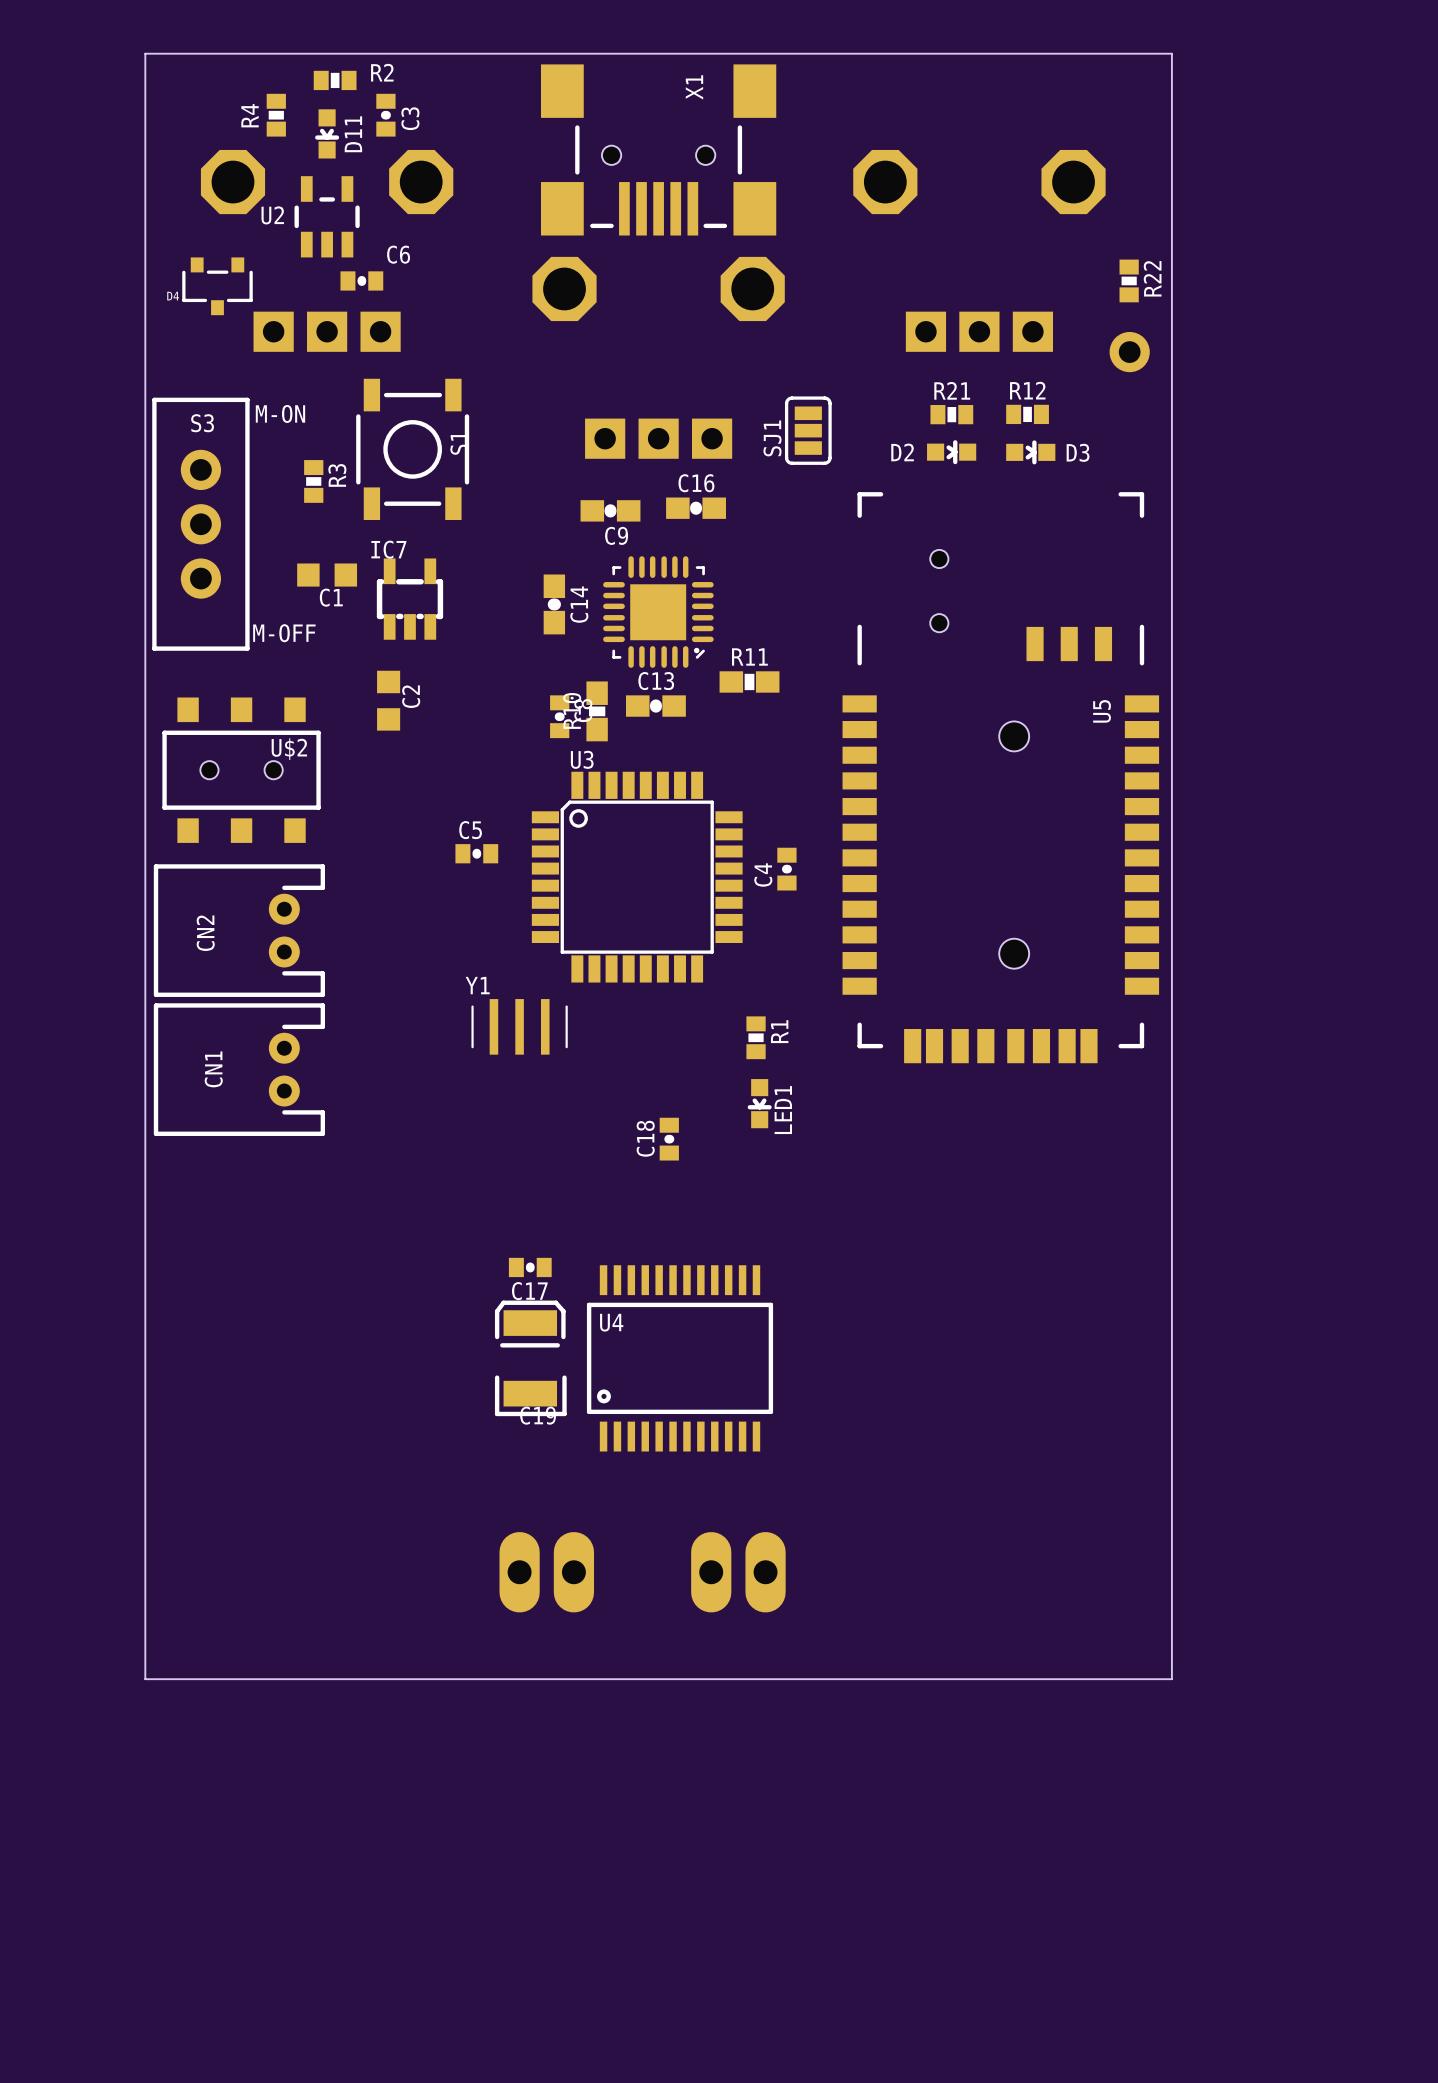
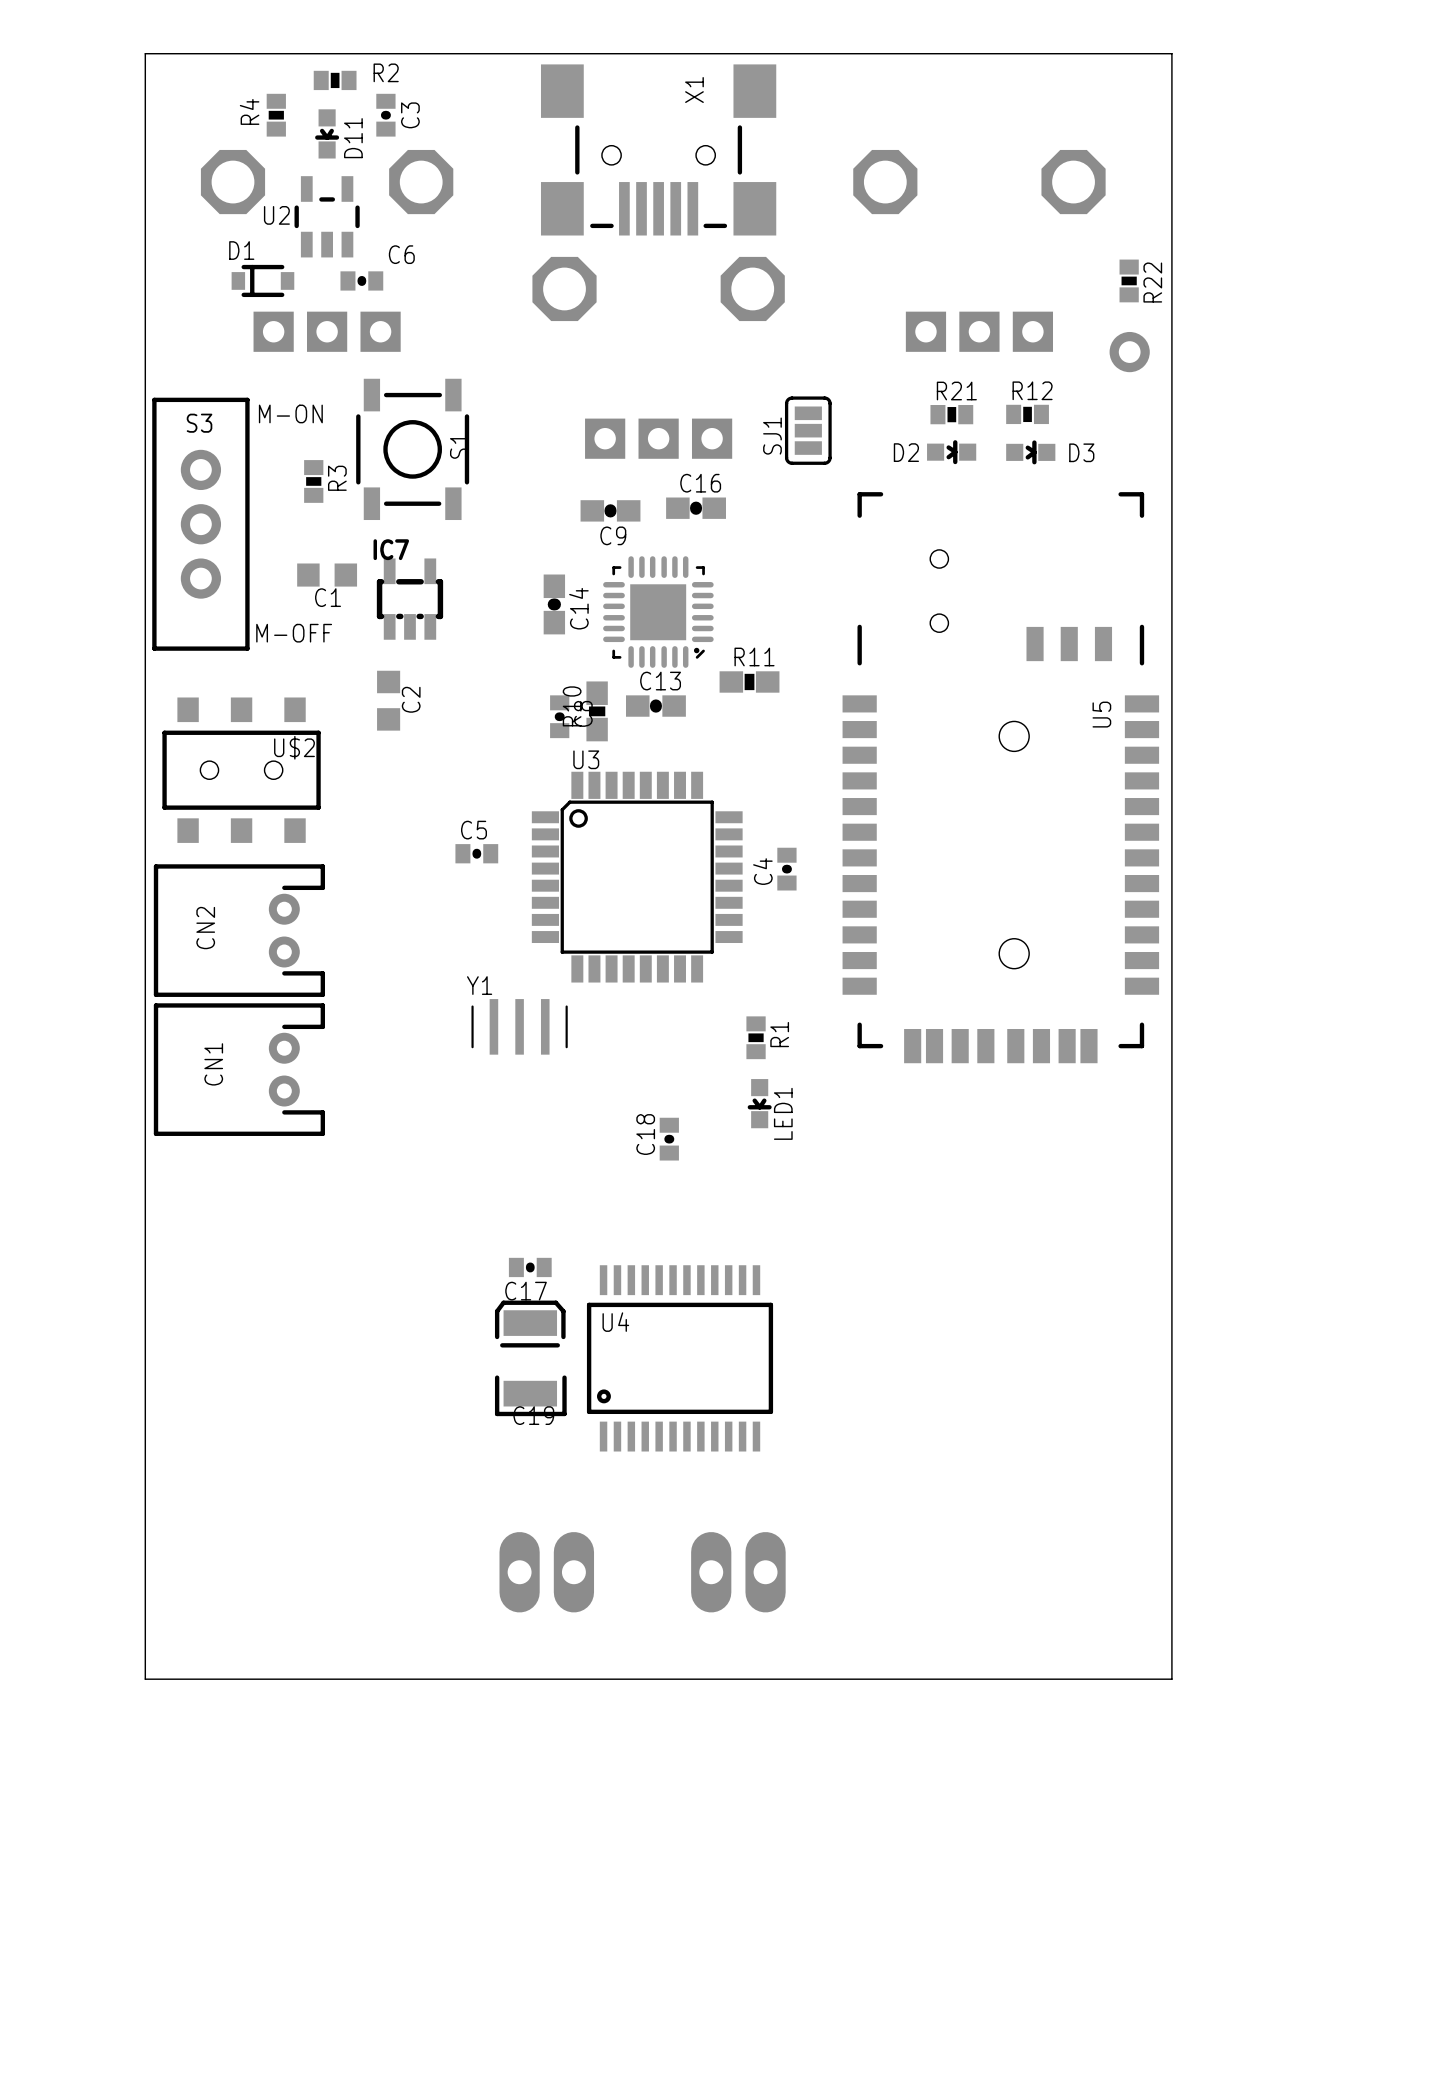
D1: none -> (262, 280)
D4: (217, 286) -> none

